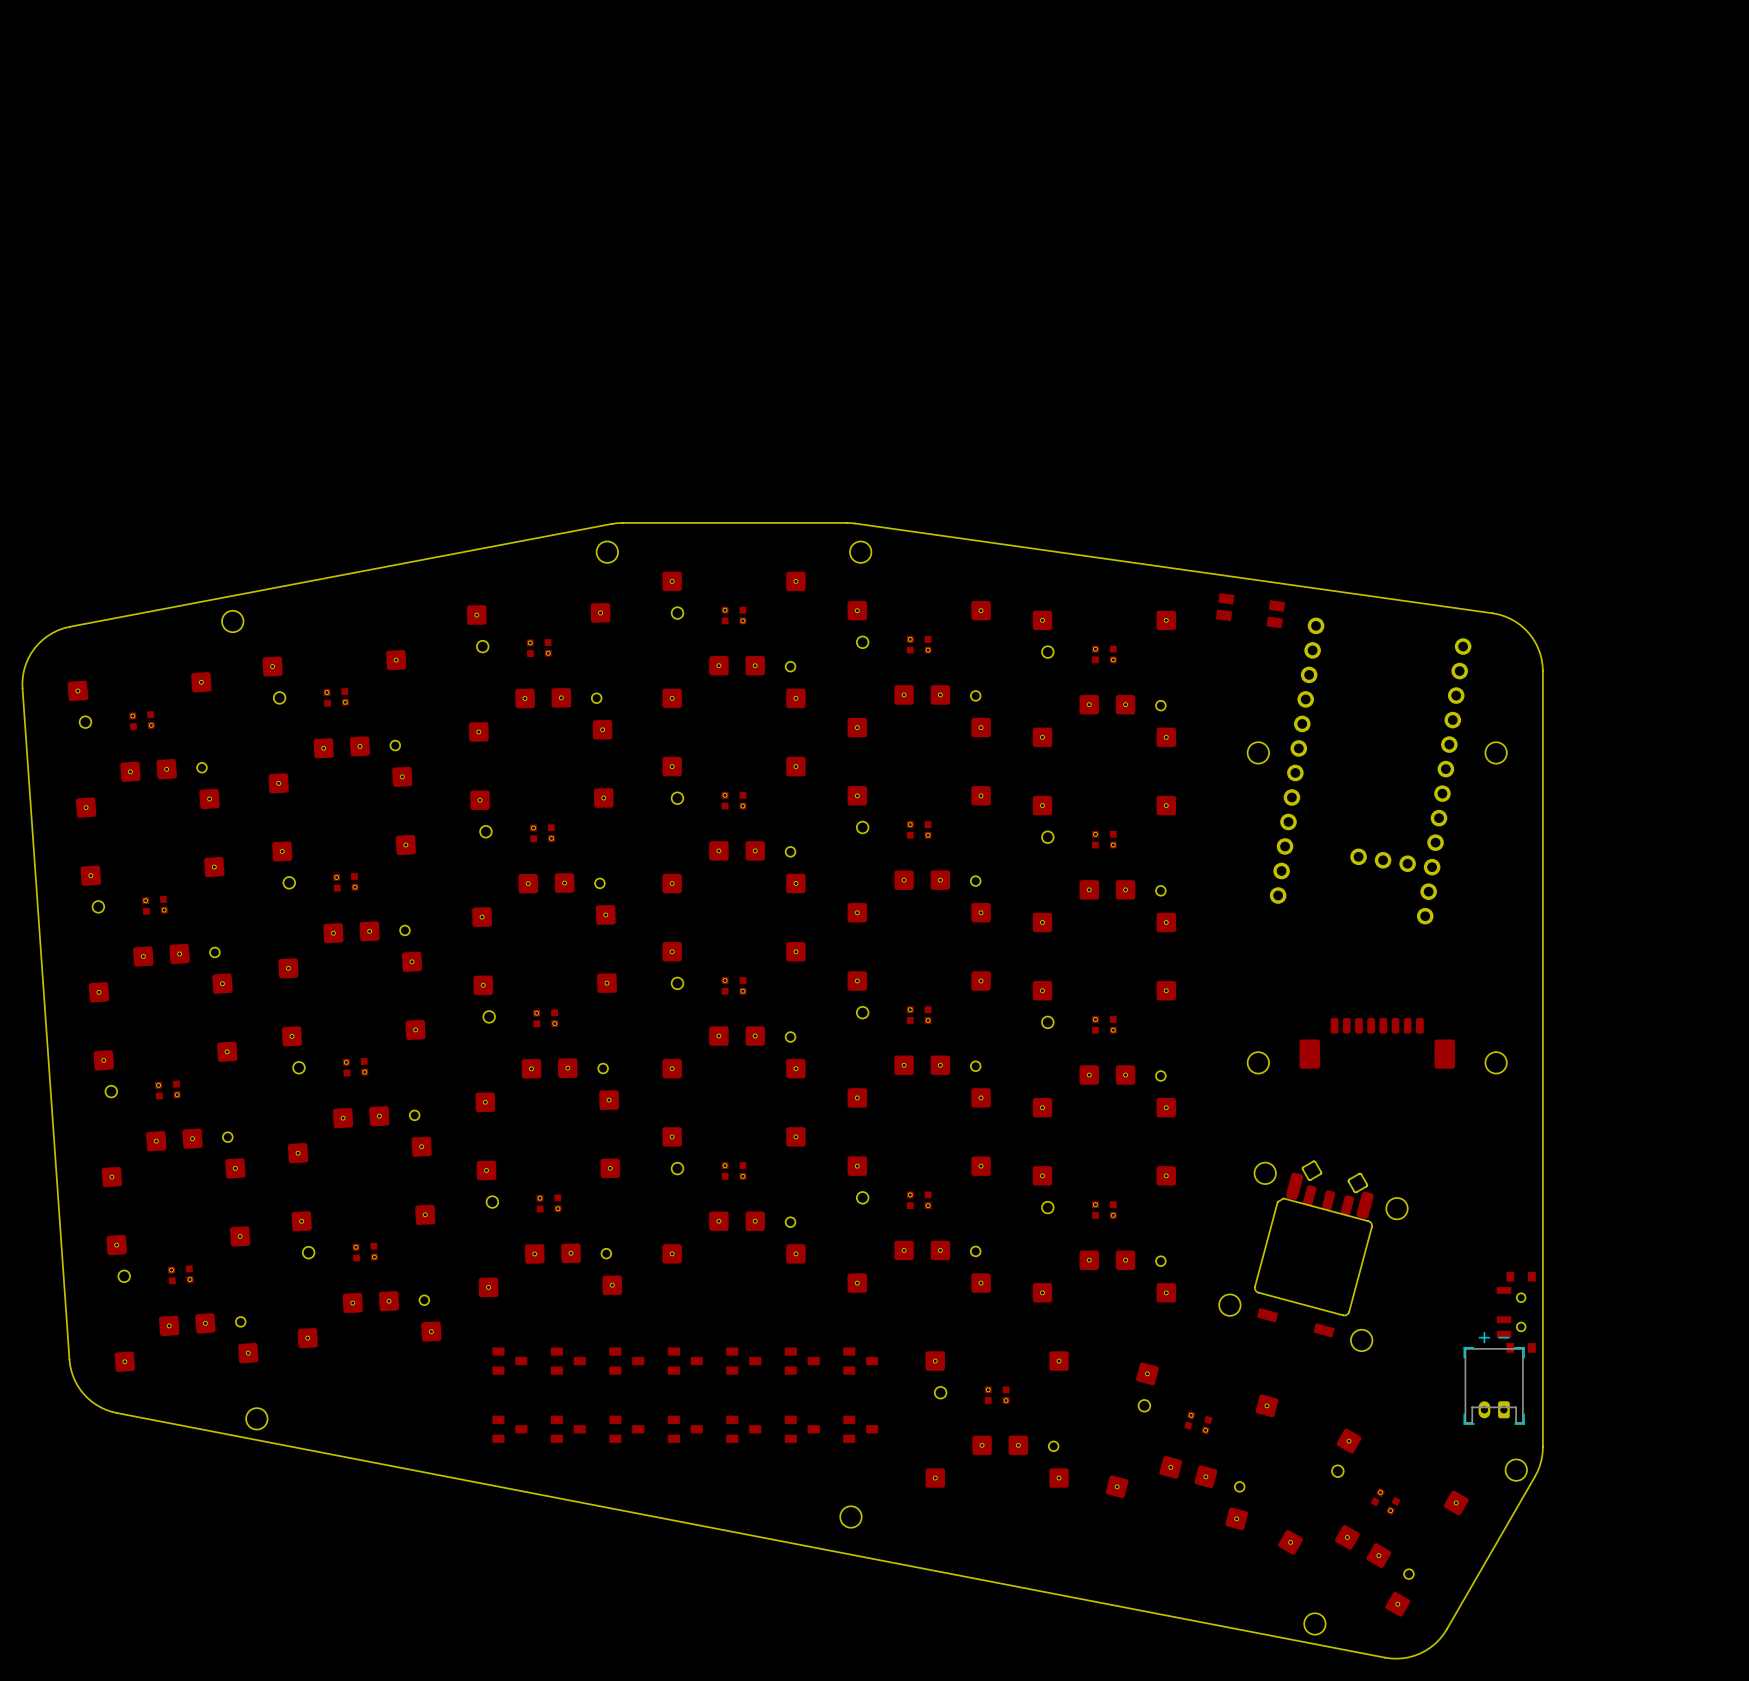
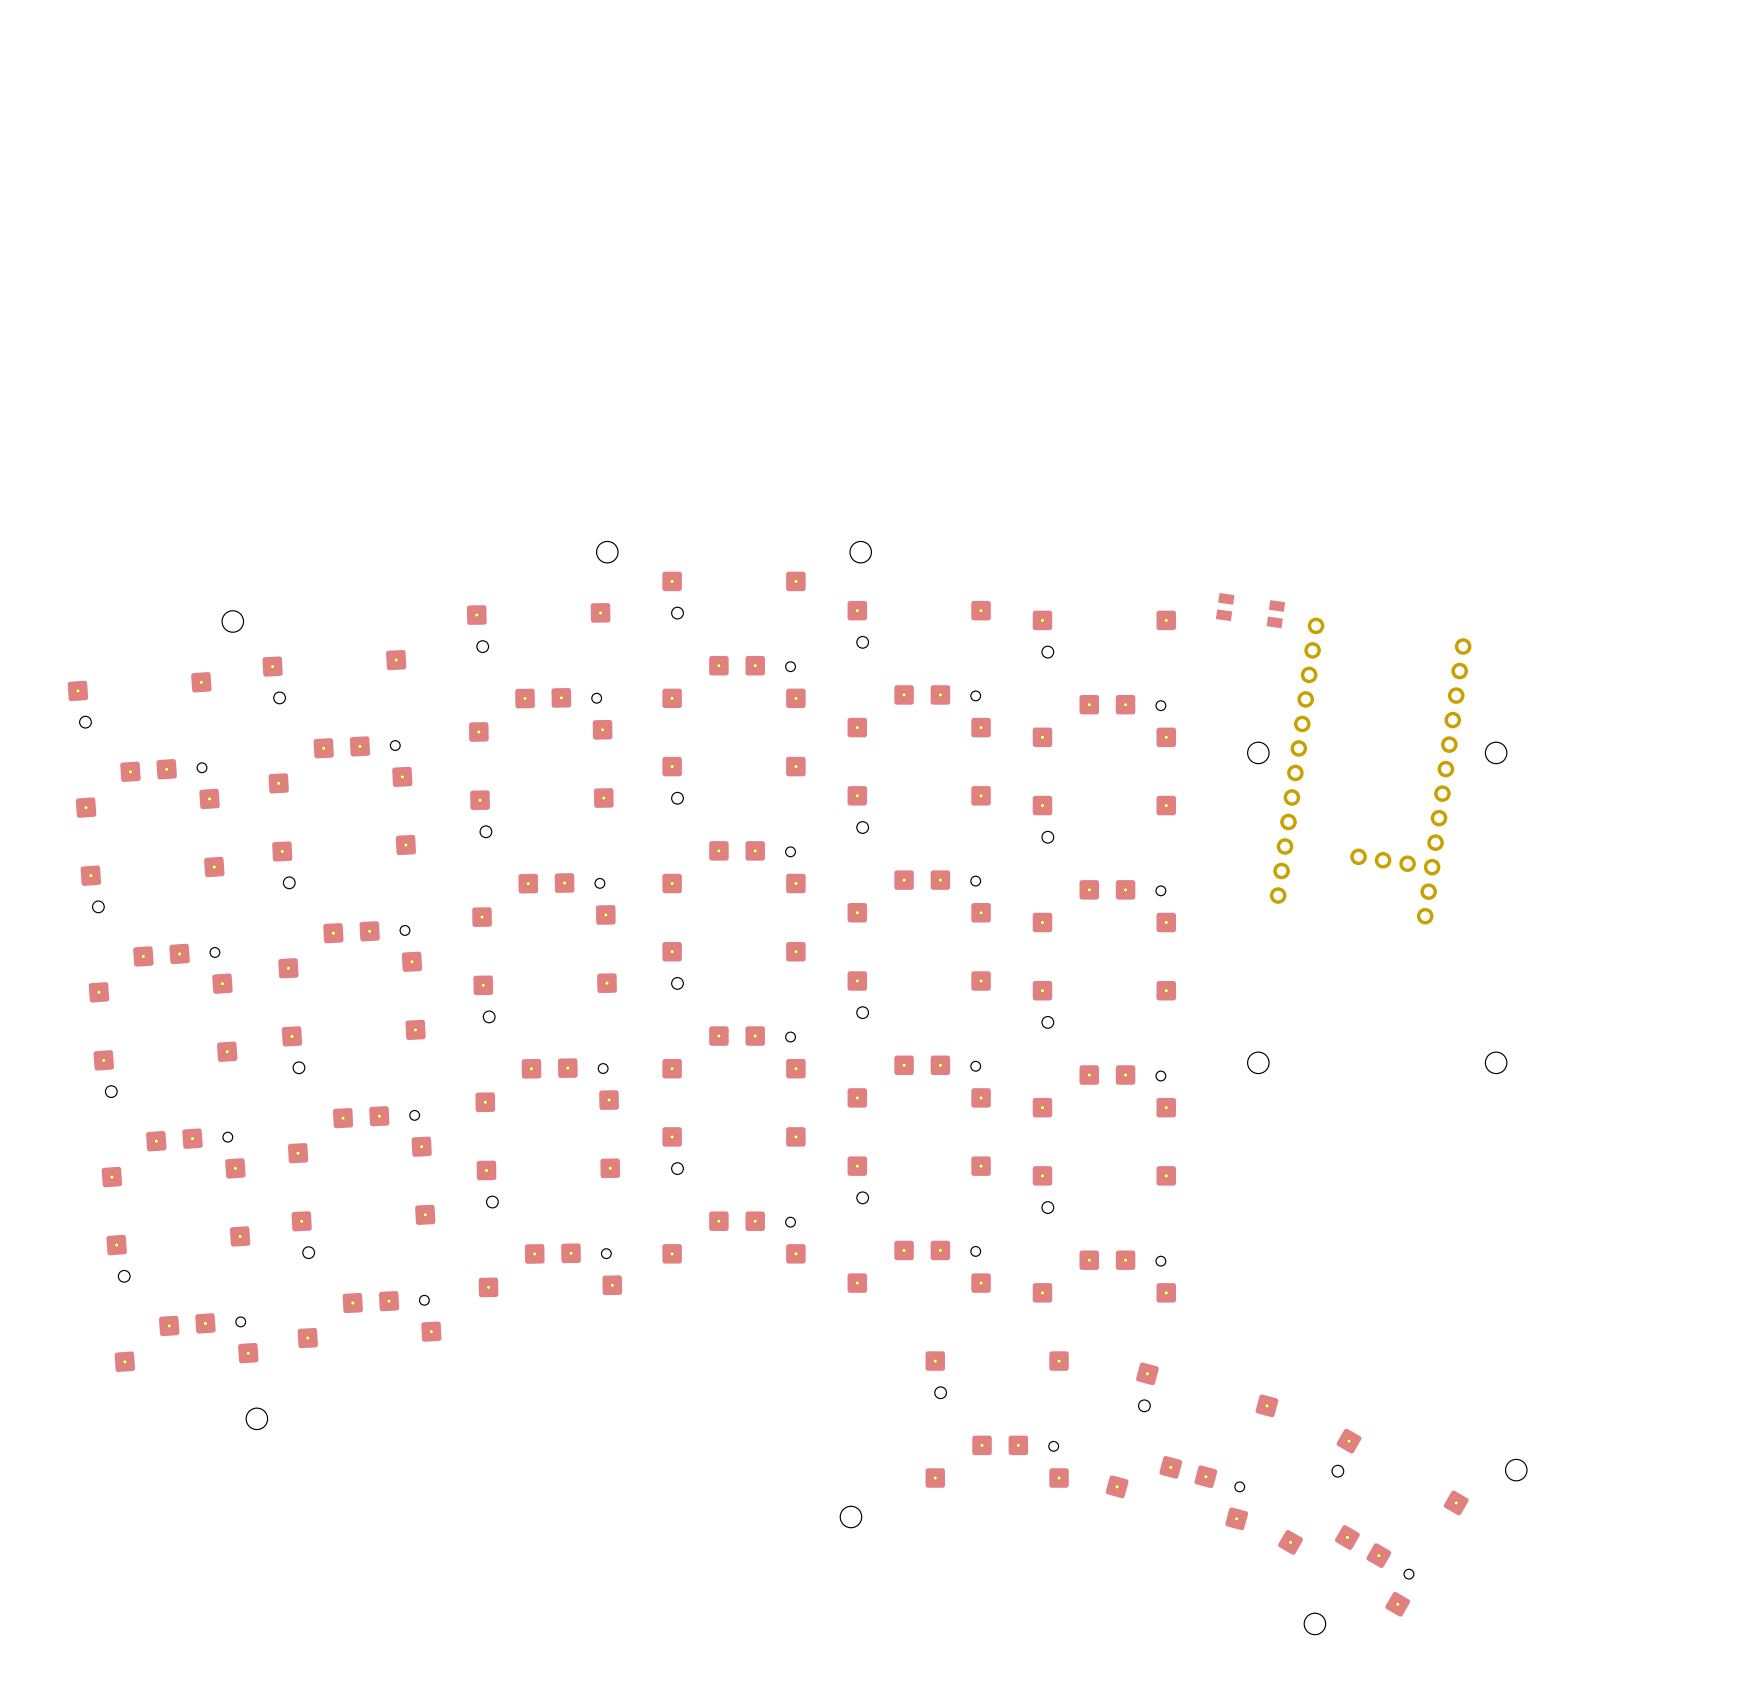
board edge: (846, 522) (611, 523) (69, 626) (52, 632) (38, 643) (25, 664) (22, 688) (69, 1359) (75, 1380) (80, 1390) (92, 1401) (106, 1409) (116, 1413) (1385, 1657) (1403, 1658) (1420, 1653) (1435, 1643) (1446, 1629) (1535, 1476) (1542, 1452) (1542, 671) (1541, 659) (1535, 642) (1524, 628) (1514, 621) (1492, 613) (846, 522) -> none
part: (734, 615) -> none
part: (919, 644) -> none
part: (539, 648) -> none
part: (1104, 654) -> none
part: (336, 697) -> none
part: (142, 720) -> none
part: (734, 800) -> none
part: (919, 829) -> none
part: (542, 833) -> none
part: (1104, 839) -> none
part: (345, 882) -> none
part: (154, 905) -> none
part: (734, 985) -> none
part: (919, 1015) -> none
part: (545, 1018) -> none
part: (1104, 1024) -> none
part: (1377, 1043) -> none
part: (355, 1067) -> none
part: (167, 1090) -> none
part: (734, 1171) -> none
part: (919, 1200) -> none
part: (548, 1203) -> none
part: (1104, 1210) -> none
part: (365, 1252) -> none
part: (1313, 1256) -> none
part: (180, 1274) -> none
part: (1516, 1312) -> none
part: (509, 1361) -> none
part: (568, 1361) -> none
part: (626, 1361) -> none
part: (685, 1361) -> none
part: (743, 1361) -> none
part: (802, 1361) -> none
part: (860, 1361) -> none
part: (1494, 1378) -> none
part: (997, 1395) -> none
part: (1198, 1422) -> none
part: (509, 1429) -> none
part: (568, 1429) -> none
part: (626, 1429) -> none
part: (685, 1429) -> none
part: (743, 1429) -> none
part: (802, 1429) -> none
part: (860, 1429) -> none
part: (1385, 1501) -> none

